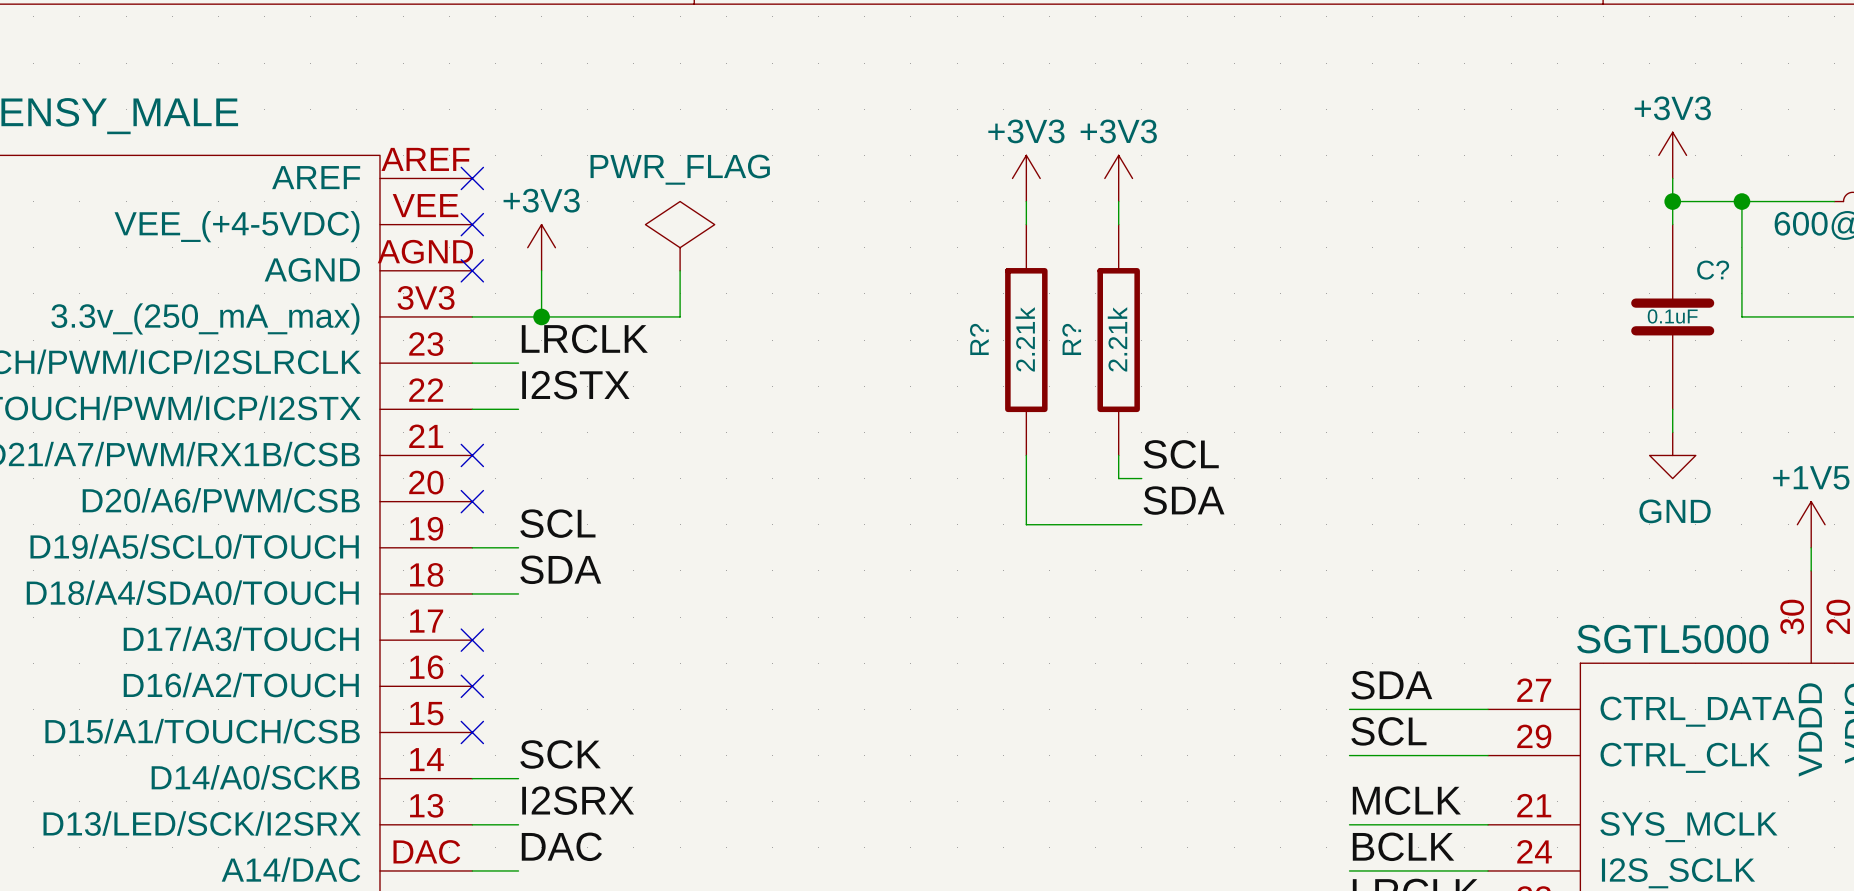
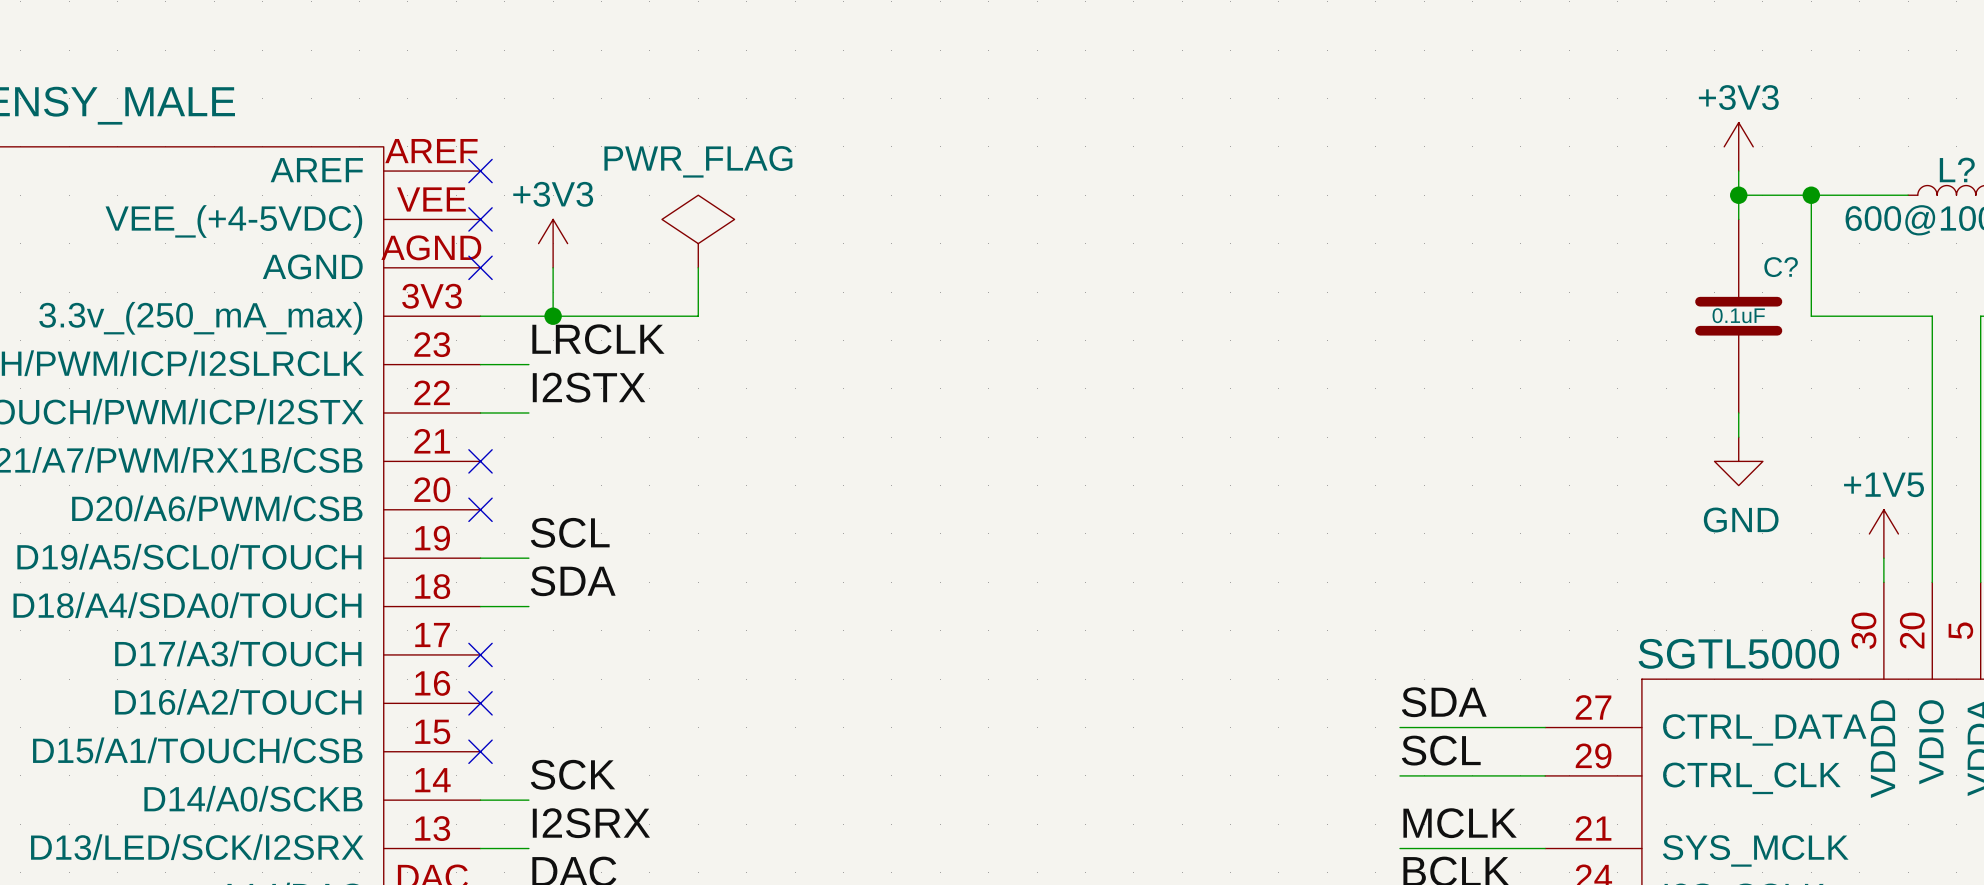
power symbol: +3V3 (1026, 178) -> none
power symbol: +3V3 (1118, 178) -> none
wire: (1026, 201) (1026, 224) -> none
wire: (1118, 201) (1118, 224) -> none
R?: 2.21k (1026, 340) -> none
R?: 2.21k (1118, 340) -> none
label: SCL (1181, 454) -> none
wire: (1026, 455) (1026, 524) (1141, 524) -> none
wire: (1118, 455) (1118, 478) (1141, 478) -> none
label: SDA (1184, 500) -> none

